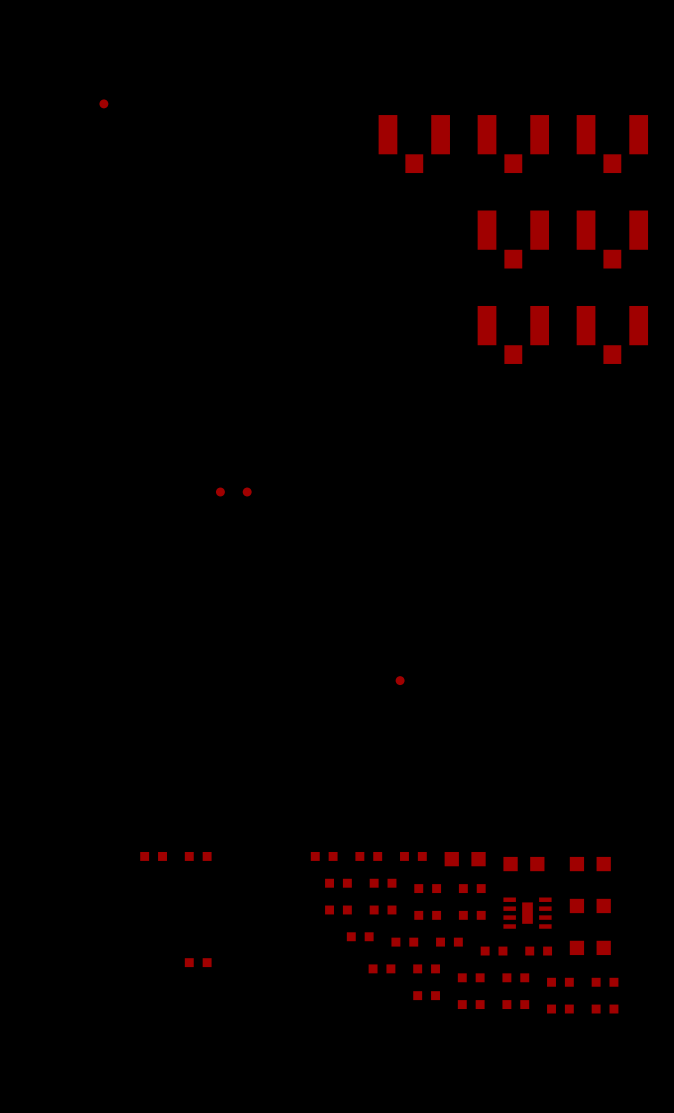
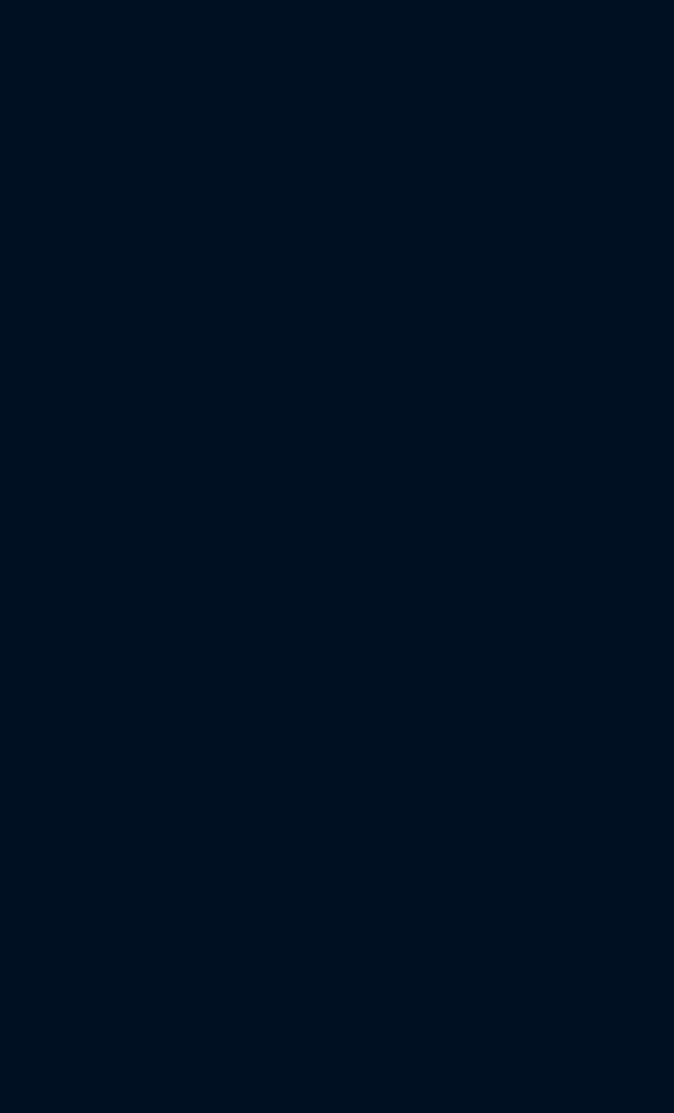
part: (103, 103) -> none
part: (414, 144) -> none
part: (513, 144) -> none
part: (612, 144) -> none
part: (513, 239) -> none
part: (612, 239) -> none
part: (513, 334) -> none
part: (612, 334) -> none
part: (220, 492) -> none
part: (247, 492) -> none
part: (400, 680) -> none
part: (153, 856) -> none
part: (198, 856) -> none
part: (324, 856) -> none
part: (368, 856) -> none
part: (413, 856) -> none
part: (465, 859) -> none
part: (523, 864) -> none
part: (590, 864) -> none
part: (338, 883) -> none
part: (383, 883) -> none
part: (427, 888) -> none
part: (472, 888) -> none
part: (590, 905) -> none
part: (338, 909) -> none
part: (383, 909) -> none
part: (527, 913) -> none
part: (427, 915) -> none
part: (472, 915) -> none
part: (360, 936) -> none
part: (404, 942) -> none
part: (449, 942) -> none
part: (590, 947) -> none
part: (494, 951) -> none
part: (538, 951) -> none
part: (198, 962) -> none
part: (381, 968) -> none
part: (426, 968) -> none
part: (471, 977) -> none
part: (515, 977) -> none
part: (560, 982) -> none
part: (605, 982) -> none
part: (426, 995) -> none
part: (471, 1004) -> none
part: (515, 1004) -> none
part: (560, 1009) -> none
part: (605, 1009) -> none

